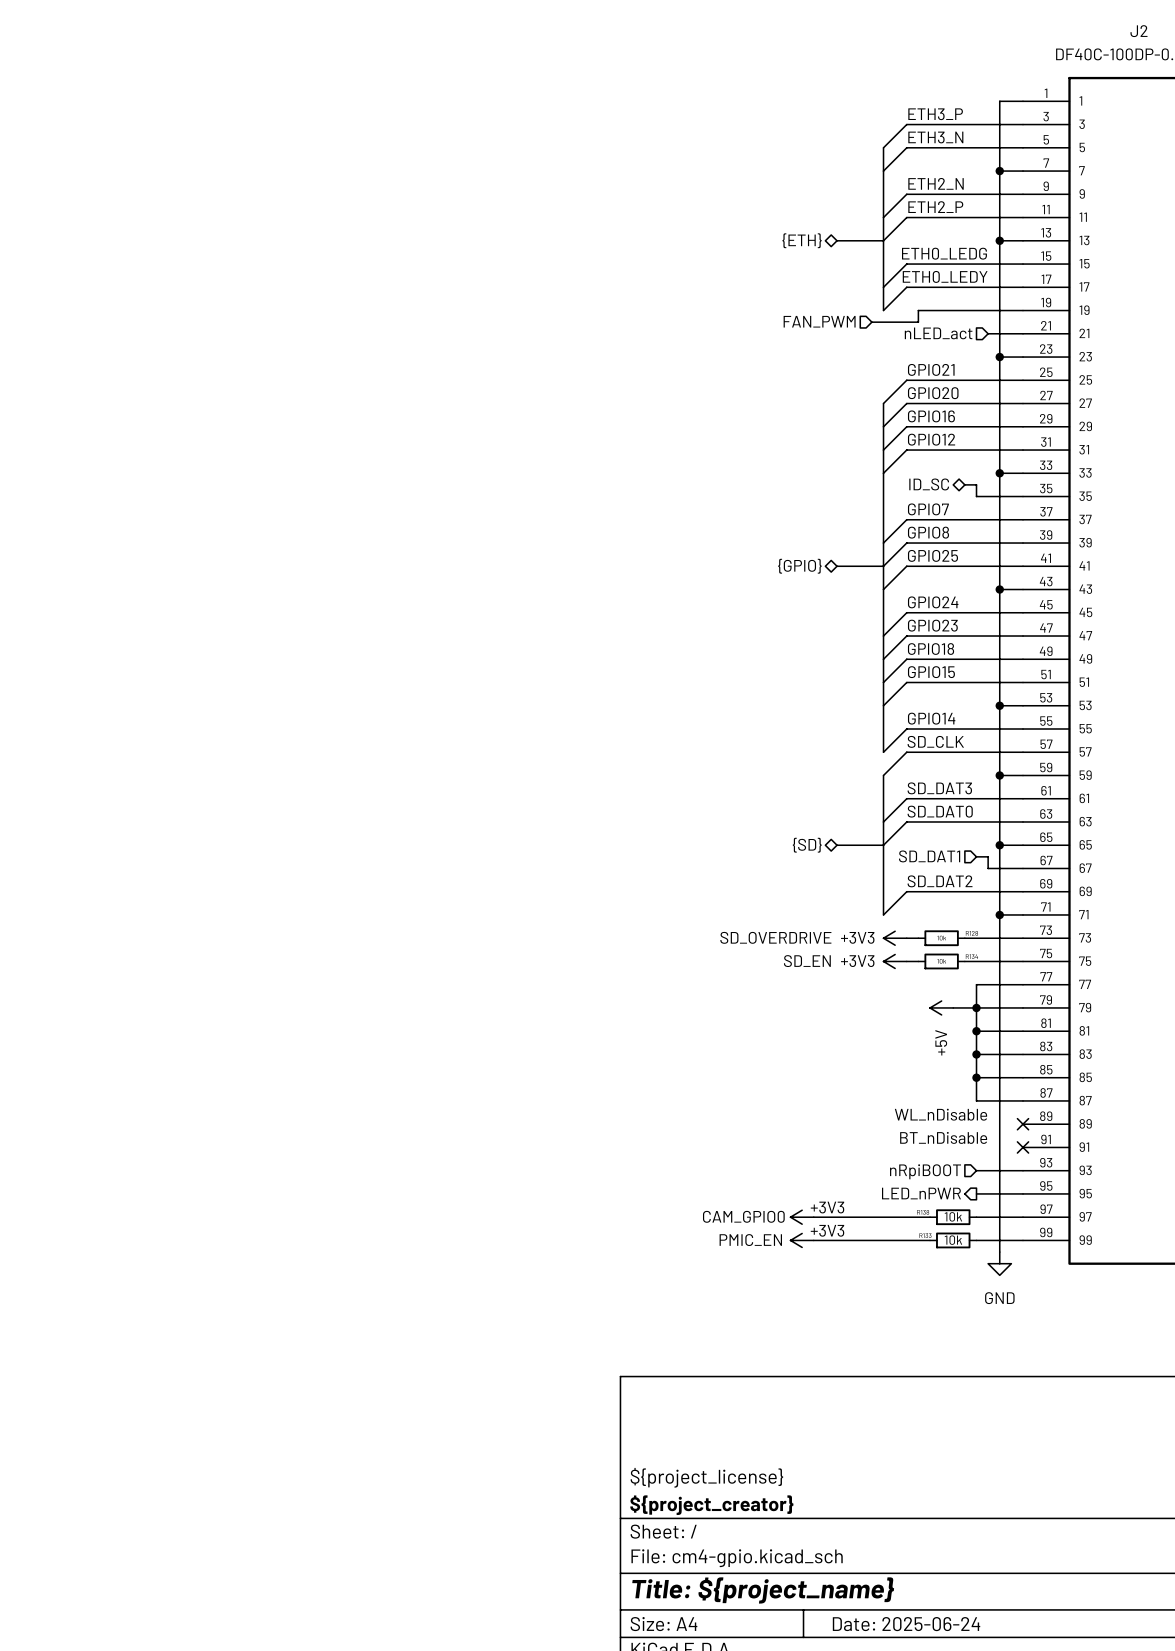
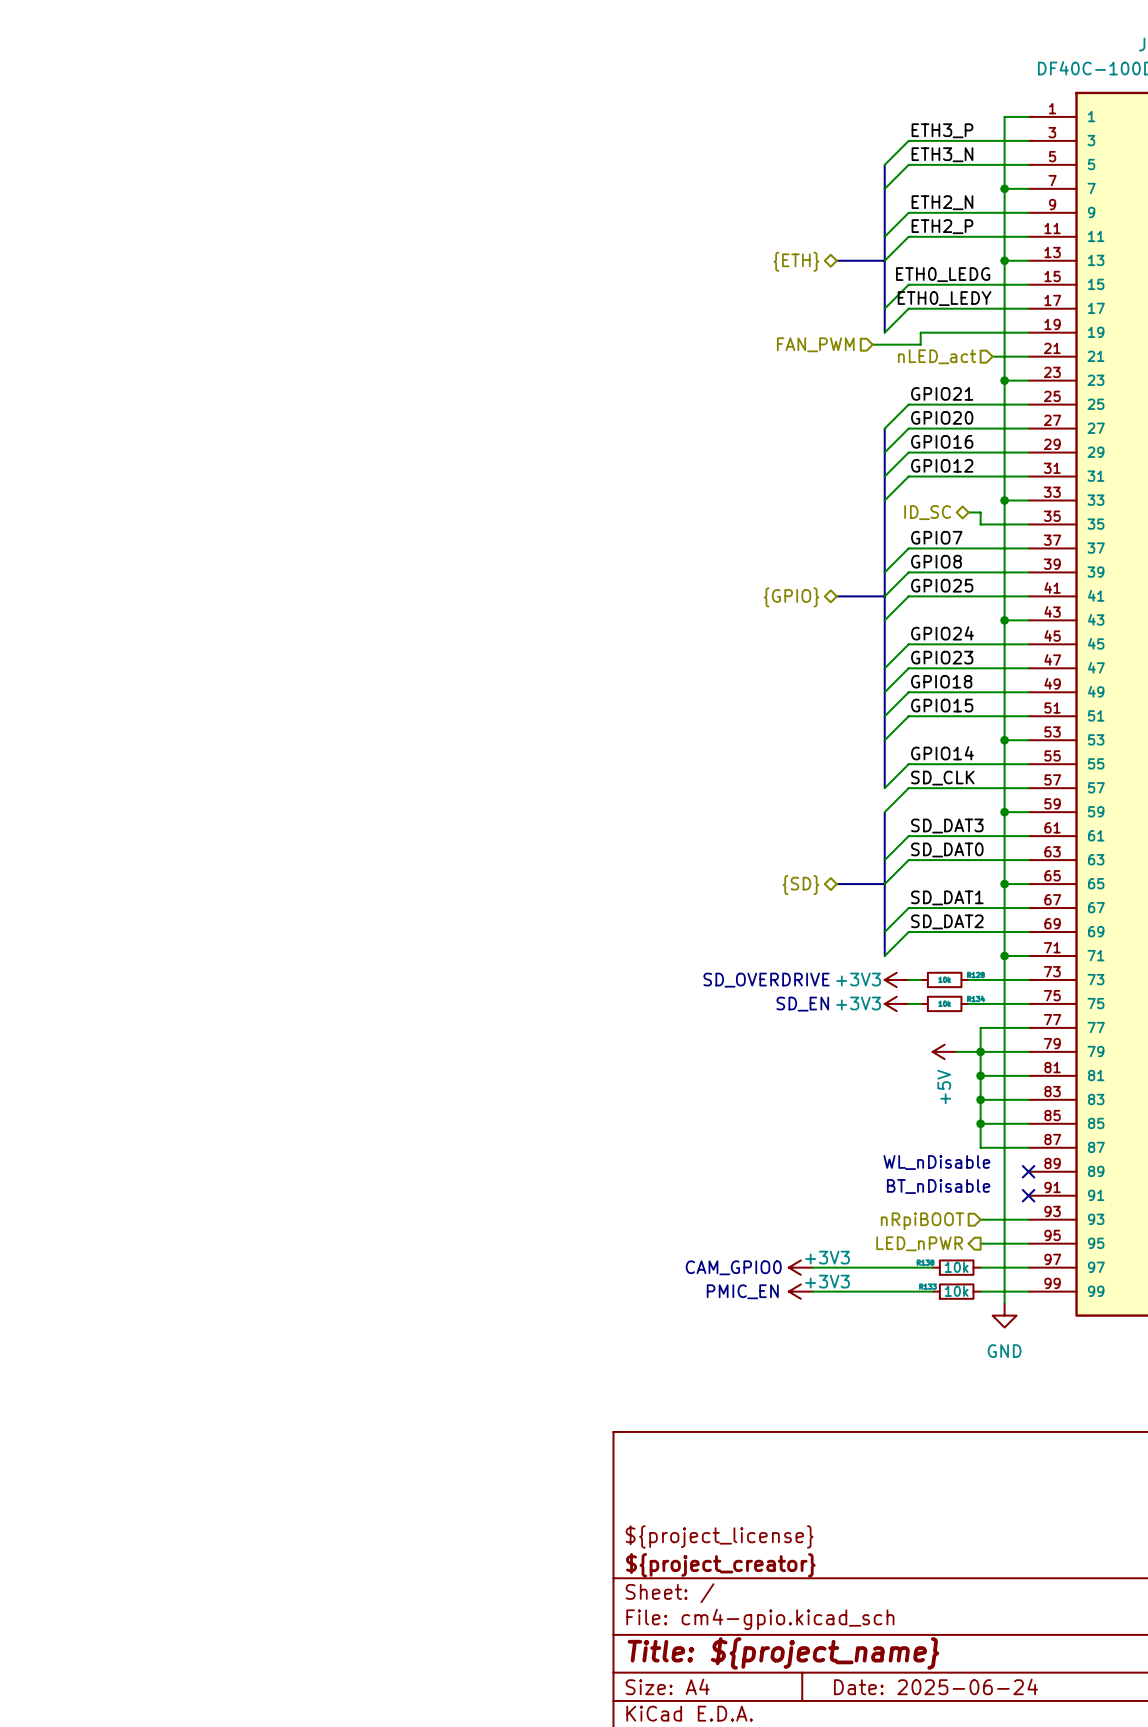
hierarchical label: SD_DAT1 (929, 856) -> none
wire: (976, 856) (988, 856) (988, 868) -> (884, 932) (908, 908) (992, 908)
label: none -> SD_DAT1 (947, 897)

